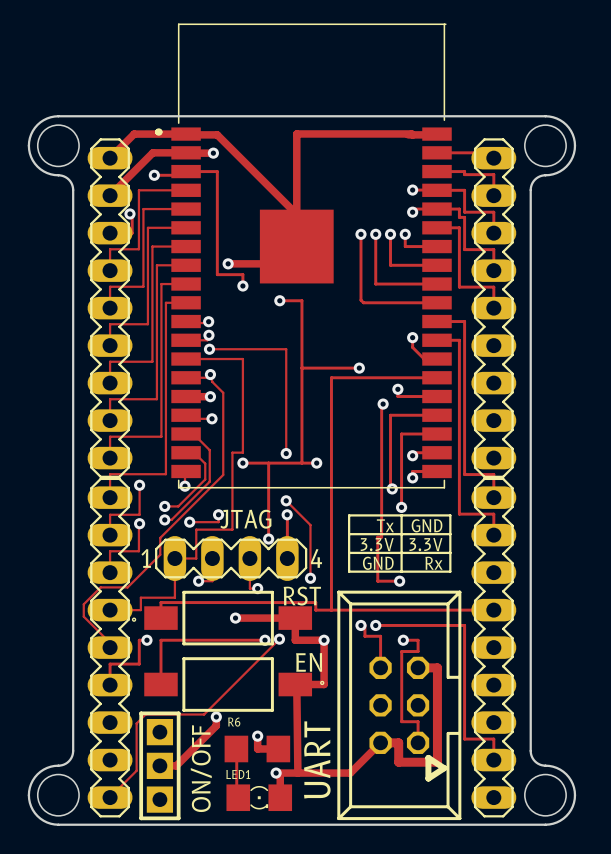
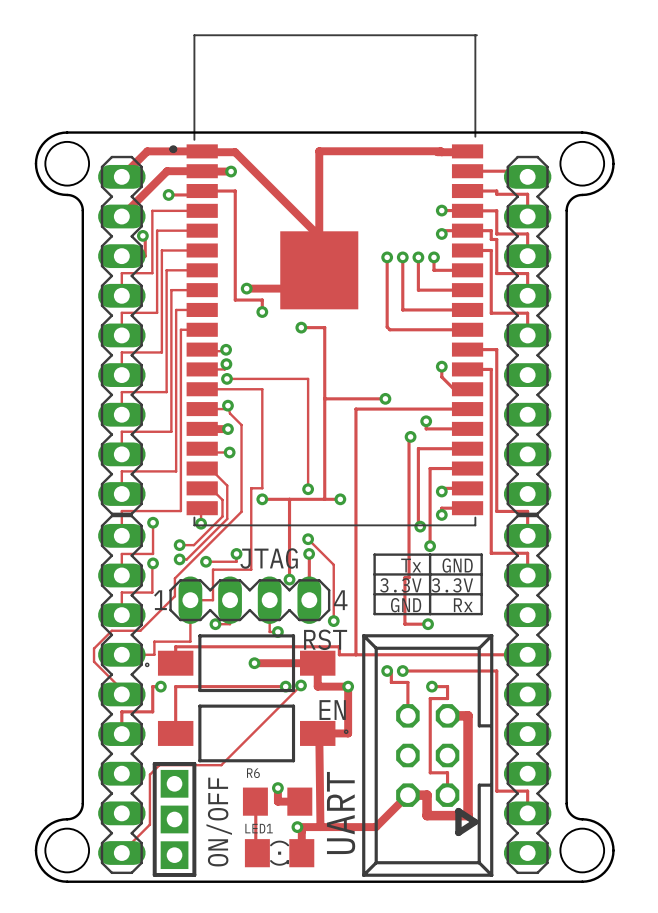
track: (216, 716) (216, 725) (176, 765) (159, 765) -> none
via: (216, 716) -> none

